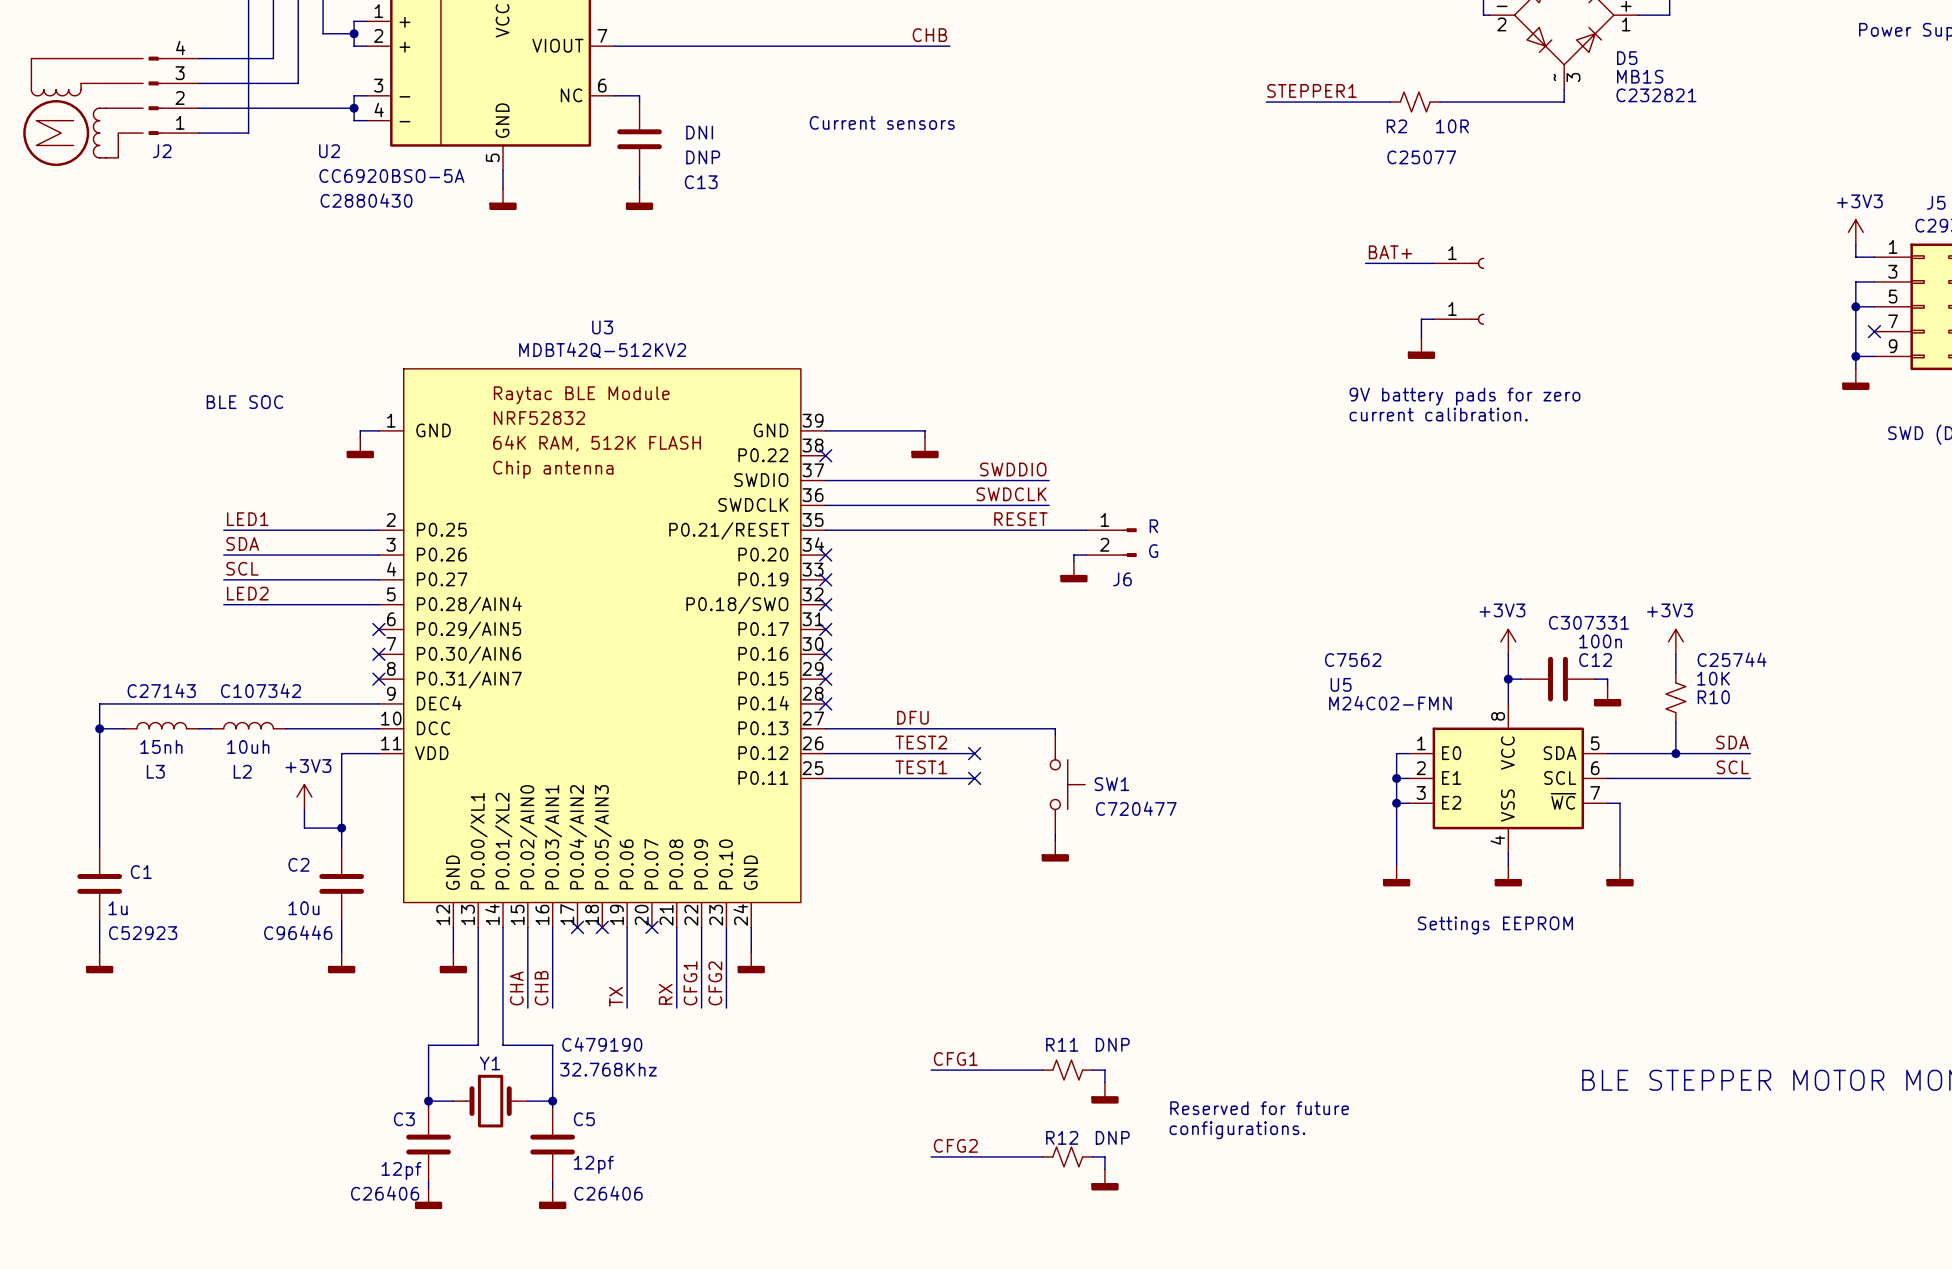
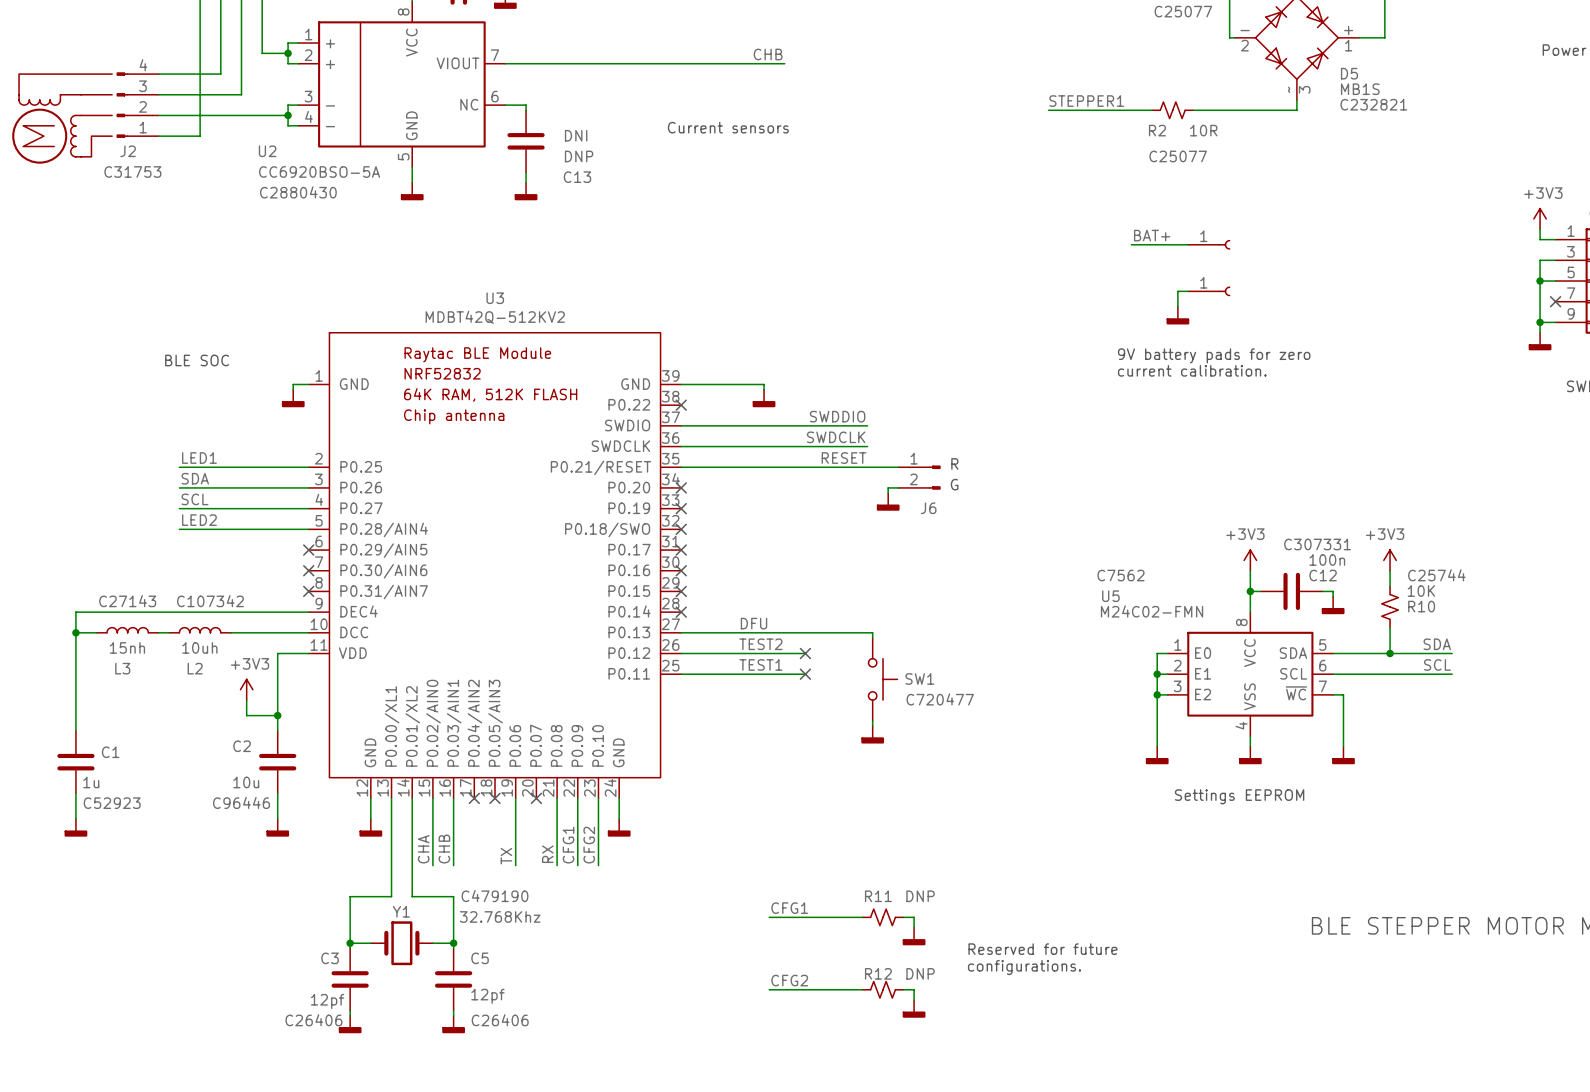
J2 text: none -> C31753 (132, 171)

